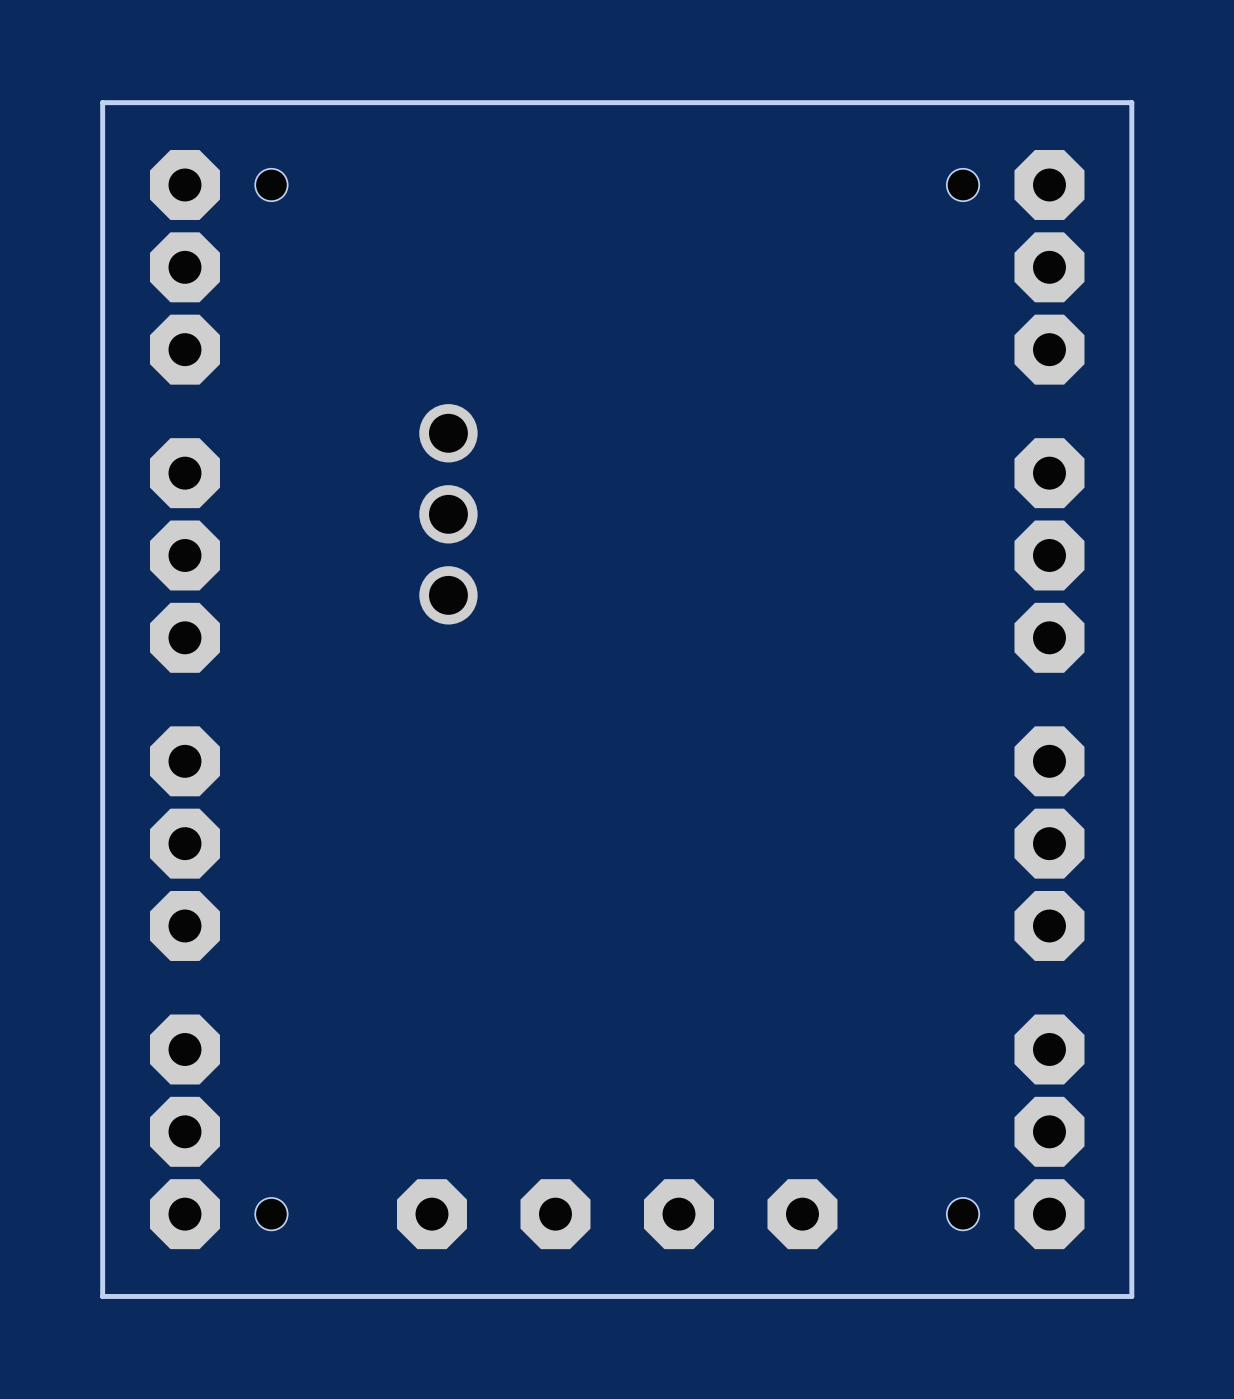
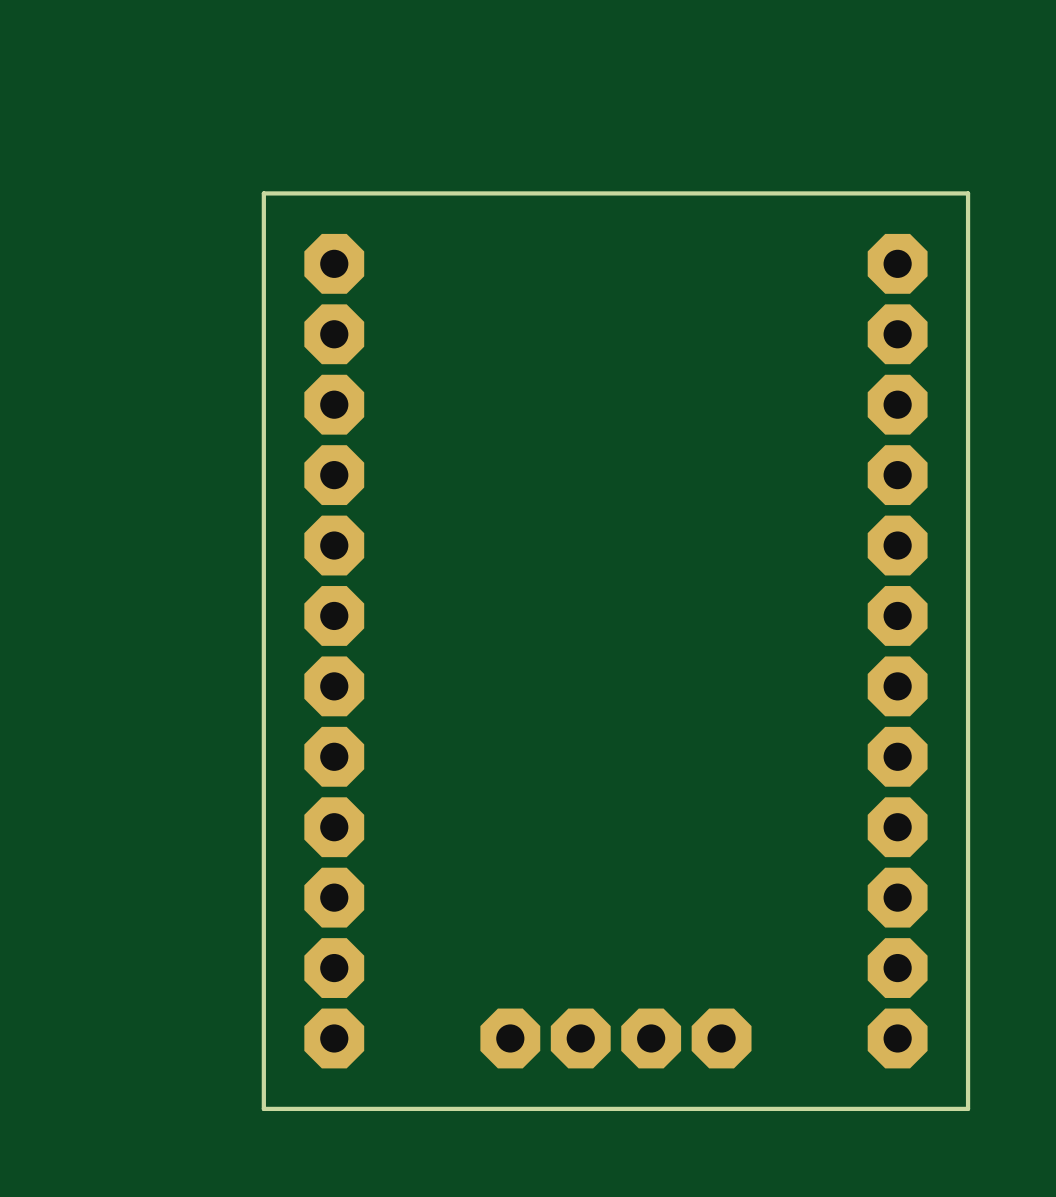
part: (184, 184) -> none
hole: (271, 184) -> none
hole: (963, 184) -> none
part: (1049, 184) -> none
board edge: (1131, 226) (1131, 102) (102, 102) (102, 1296) (308, 1296) -> (968, 193) (263, 193) (263, 1108)
part: (184, 267) -> none
part: (1049, 267) -> none
part: none -> (334, 263)
part: none -> (897, 263)
part: (184, 349) -> none
part: (1049, 349) -> none
part: none -> (334, 334)
part: none -> (897, 334)
part: (184, 473) -> none
part: none -> (334, 404)
part: (448, 514) -> none
part: (184, 555) -> none
part: none -> (334, 475)
part: (184, 637) -> none
part: none -> (334, 545)
part: none -> (334, 615)
part: none -> (897, 615)
part: (184, 761) -> none
part: (1049, 761) -> none
part: none -> (334, 686)
part: none -> (897, 686)
part: (184, 843) -> none
part: (1049, 843) -> none
part: none -> (334, 756)
part: none -> (897, 756)
part: (184, 925) -> none
part: (1049, 925) -> none
part: none -> (334, 827)
part: none -> (897, 827)
part: (184, 1049) -> none
part: none -> (334, 897)
part: (184, 1131) -> none
part: none -> (334, 968)
part: (184, 1214) -> none
hole: (271, 1214) -> none
part position: (431, 1214) -> (334, 1038)
part position: (555, 1214) -> (510, 1038)
part: none -> (651, 1038)
part: (802, 1214) -> none
part: none -> (721, 1038)
hole: (963, 1214) -> none

